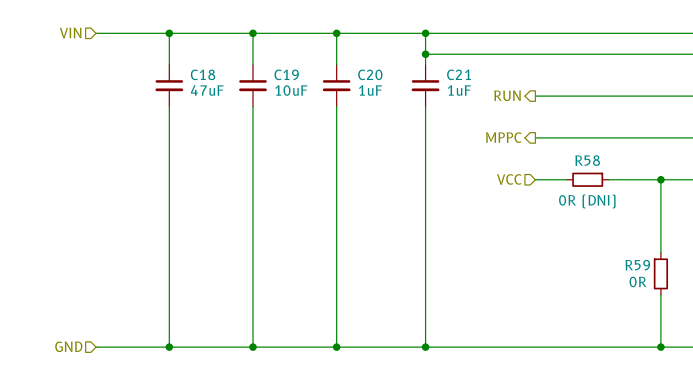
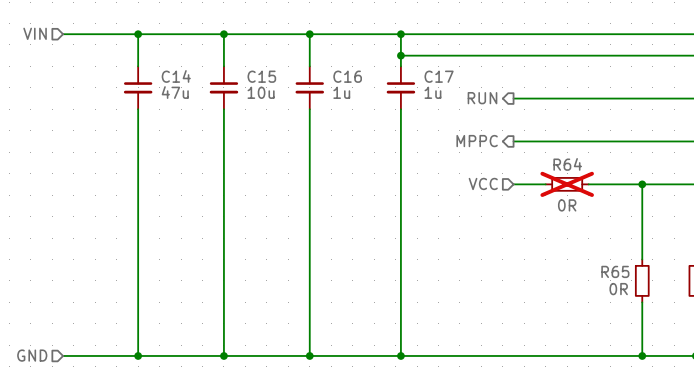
C18 name: C18 (203, 74) -> C14 (176, 76)
C19 name: C19 (286, 74) -> C15 (261, 76)
C20 name: C20 (370, 74) -> C16 (347, 76)
C21 name: C21 (459, 74) -> C17 (439, 76)
C18 value: 47uF (207, 90) -> 47u (175, 92)
C19 value: 10uF (291, 90) -> 10u (261, 92)
C20 value: 1uF (370, 90) -> 1u (341, 92)
C21 value: 1uF (459, 90) -> 1u (432, 92)
R58 name: R58 (587, 160) -> R64 (567, 164)
R58 do-not-place cross: none -> (567, 184)
R58 value: 0R (DNI) (587, 201) -> 0R (567, 205)
R59 name: R59 (637, 265) -> R65 (615, 271)

